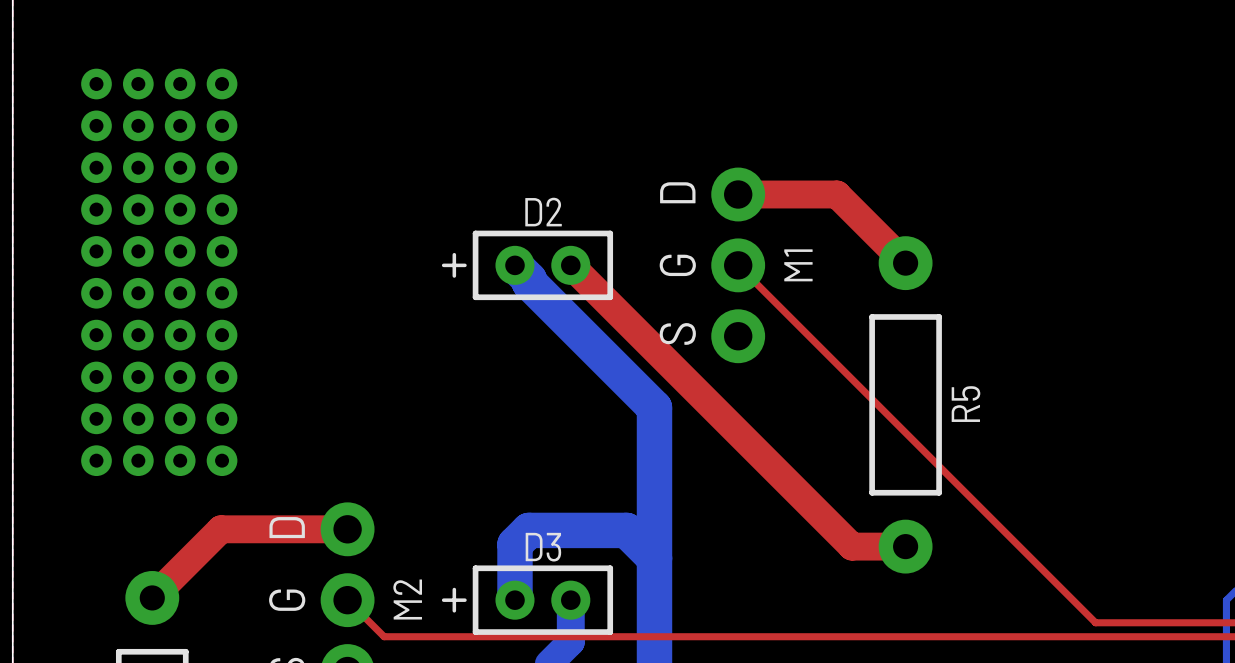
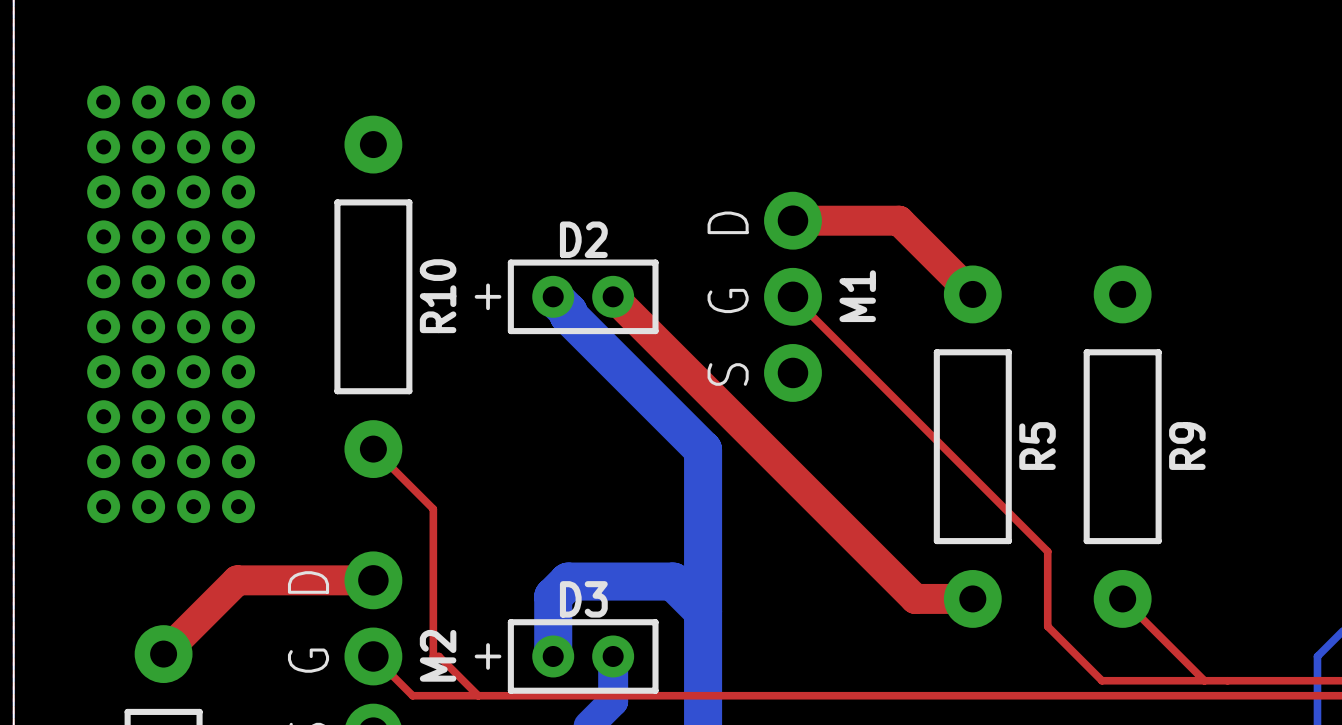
R10: none -> (373, 296)
R9: none -> (1122, 446)
top track: none -> (373, 449) (433, 509) (433, 656) (439, 656) (478, 695)
top track: (975, 502) (1095, 622) -> (1047, 551) (1047, 626) (1101, 680) (1176, 680)
top track: none -> (1122, 598) (1204, 680)

